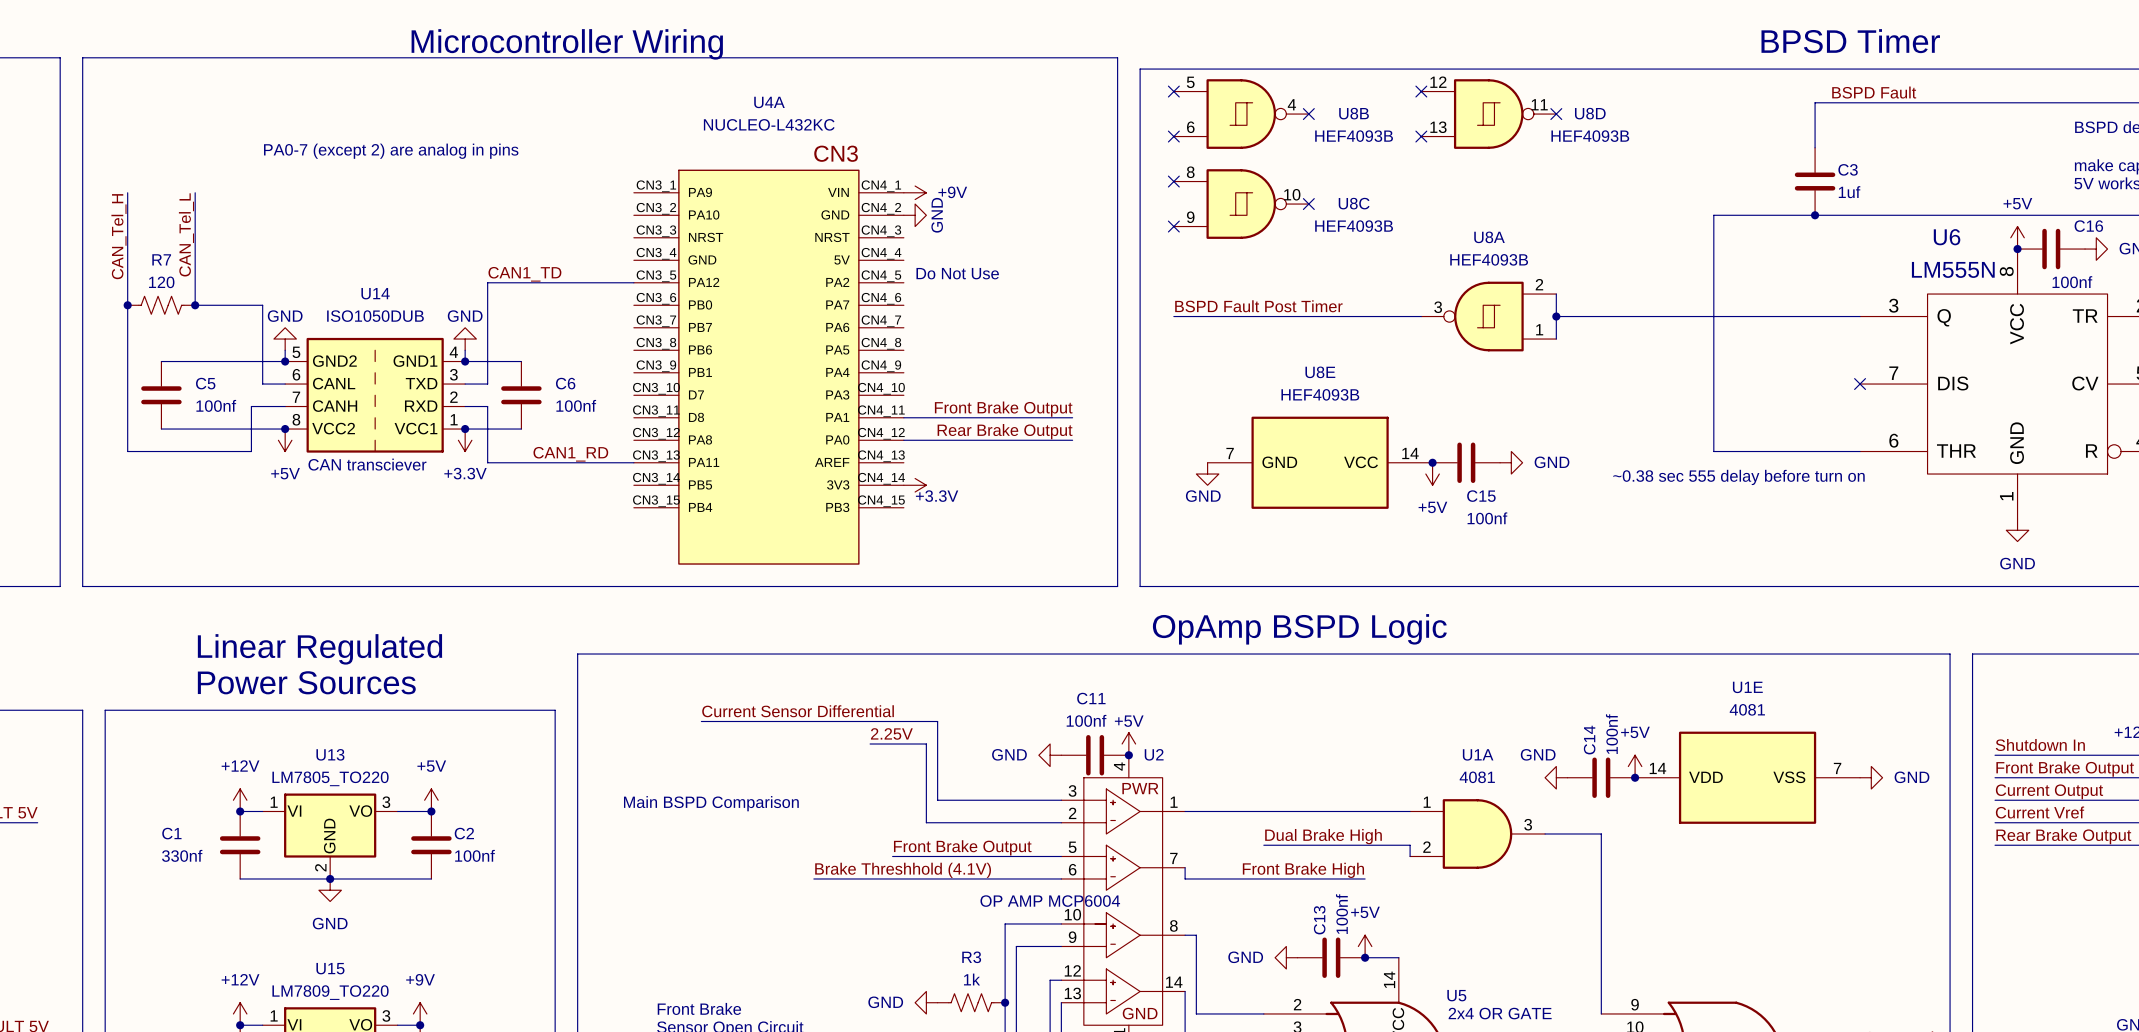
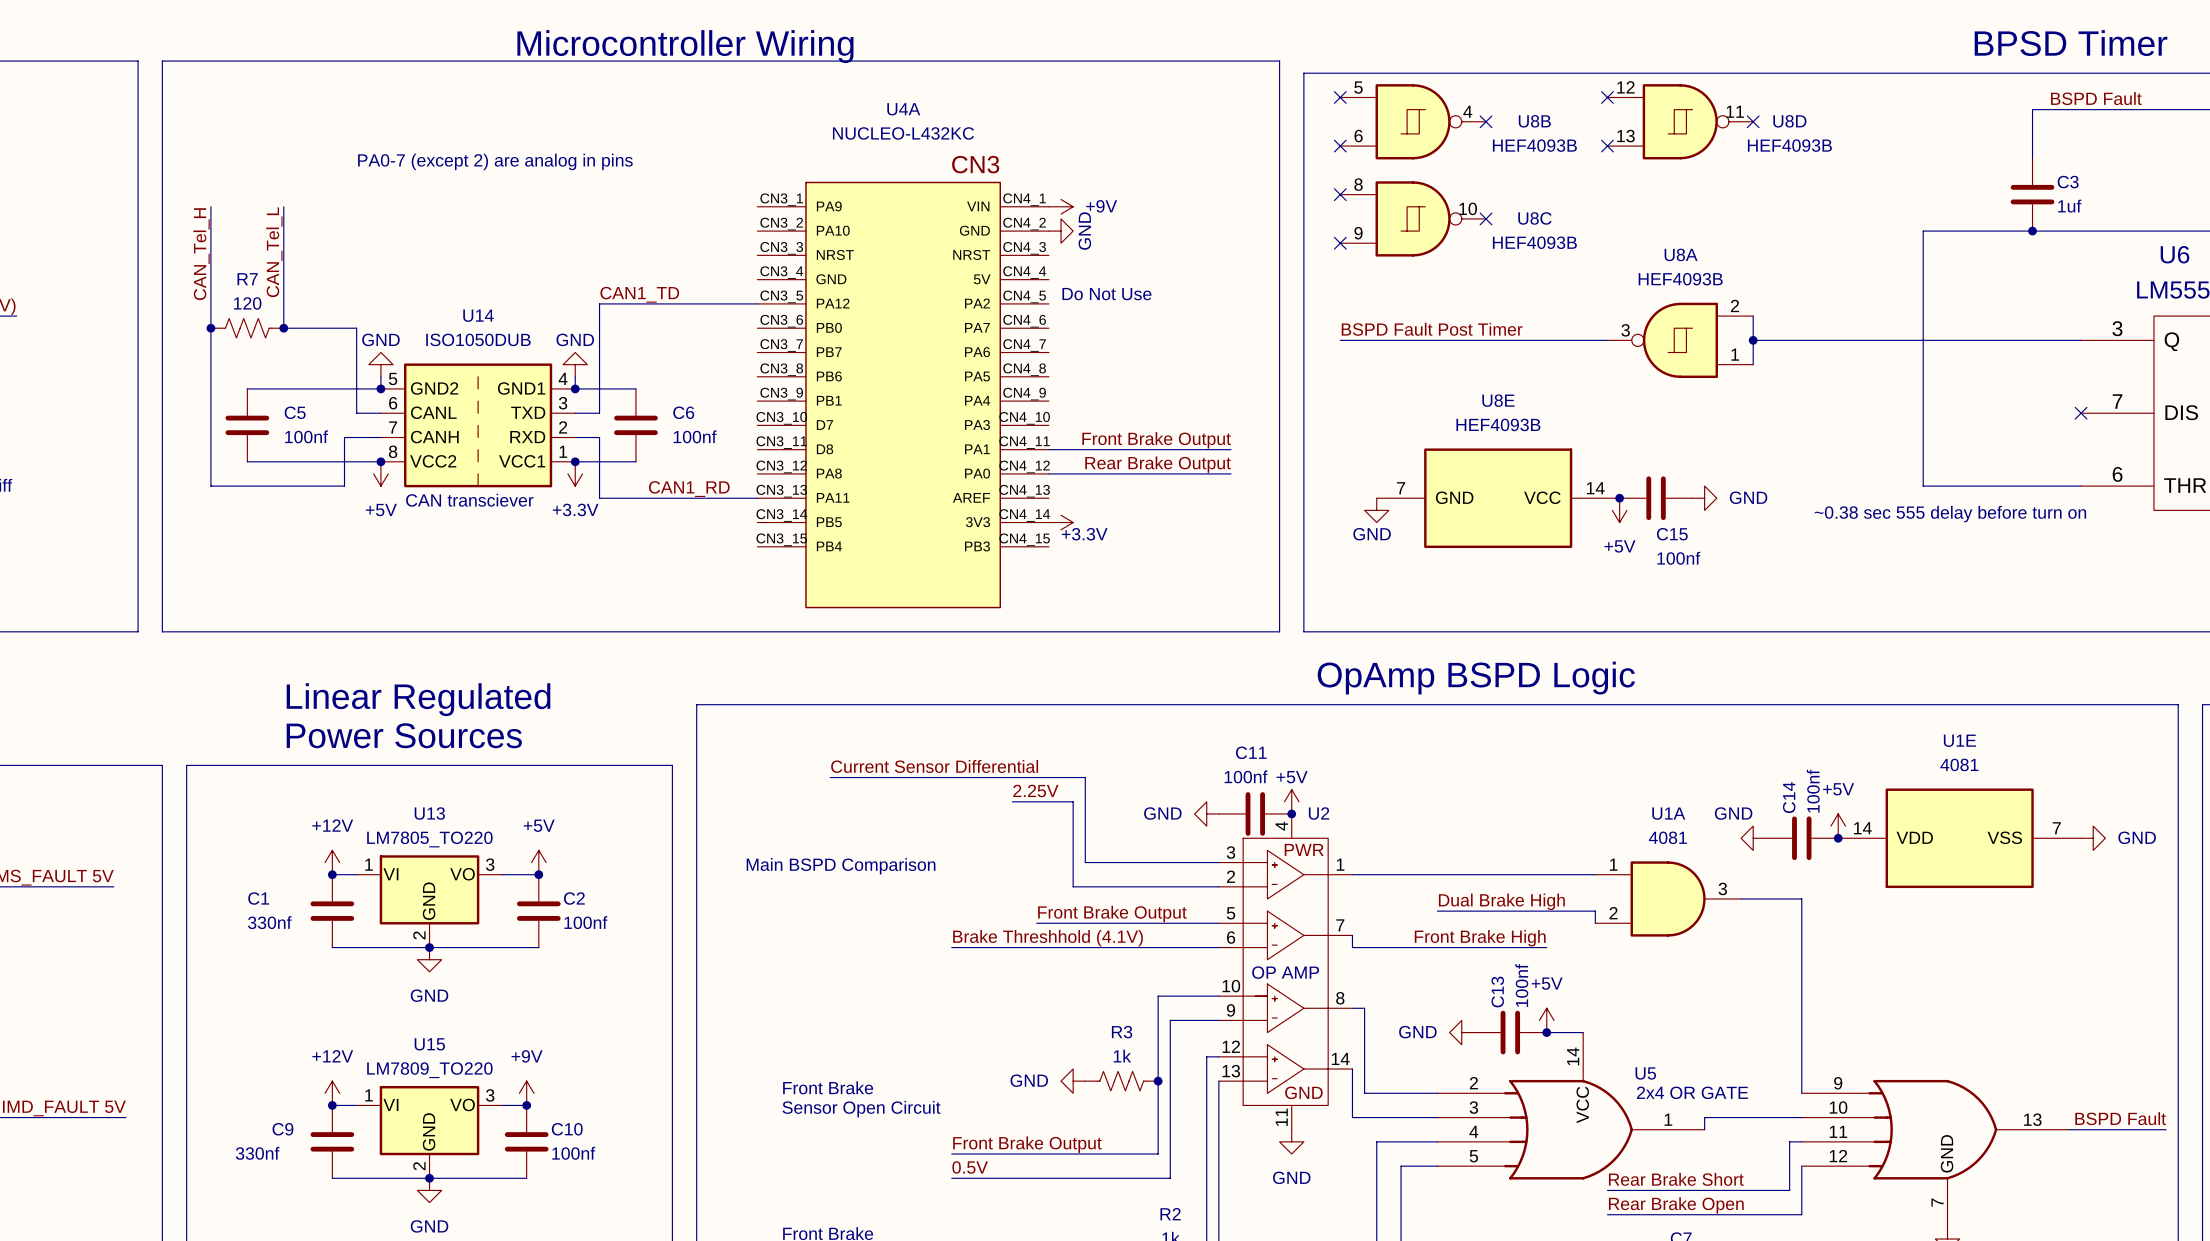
U2 value: OP AMP MCP6004 (1050, 901) -> OP AMP (1285, 972)

